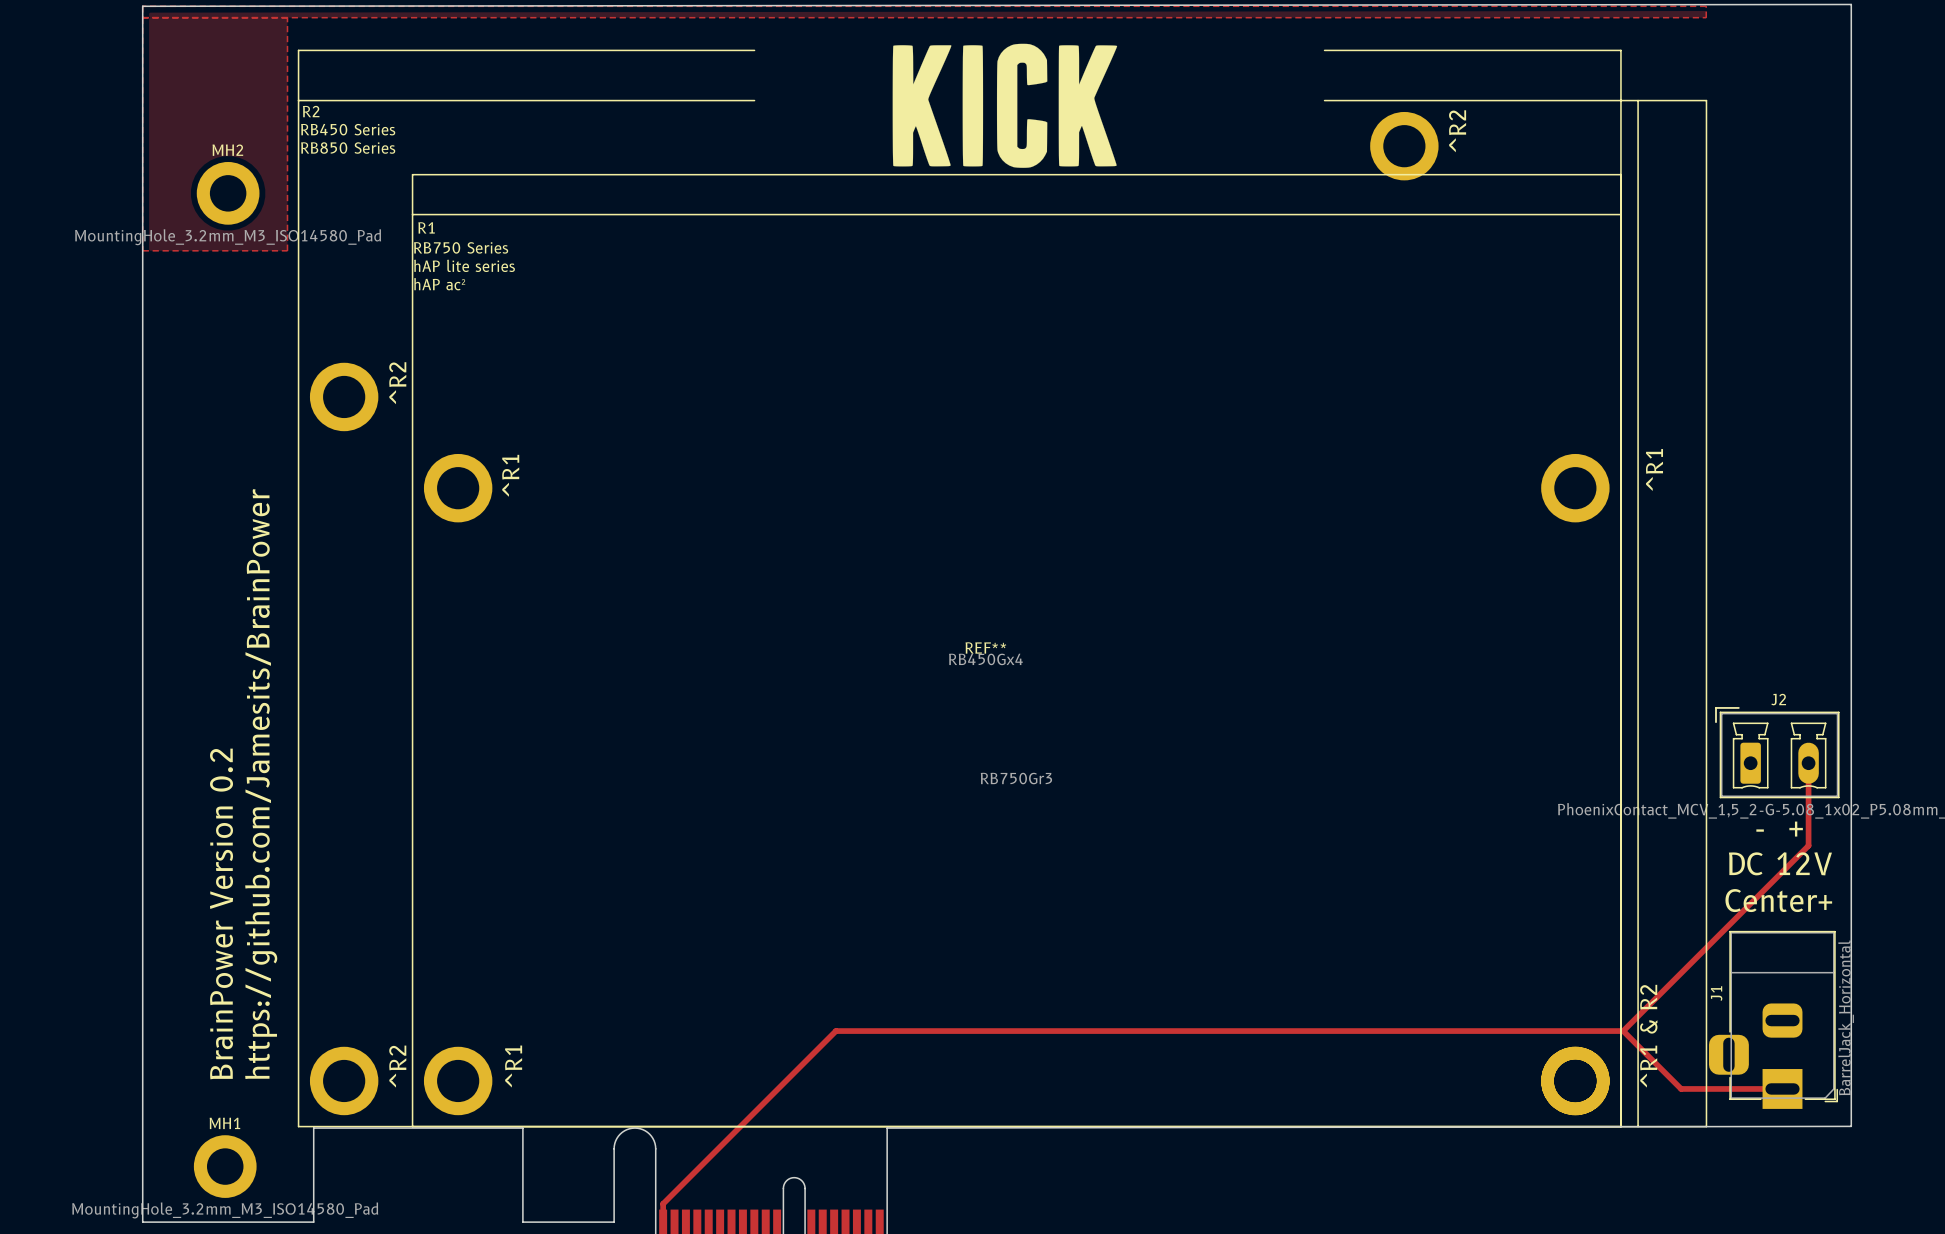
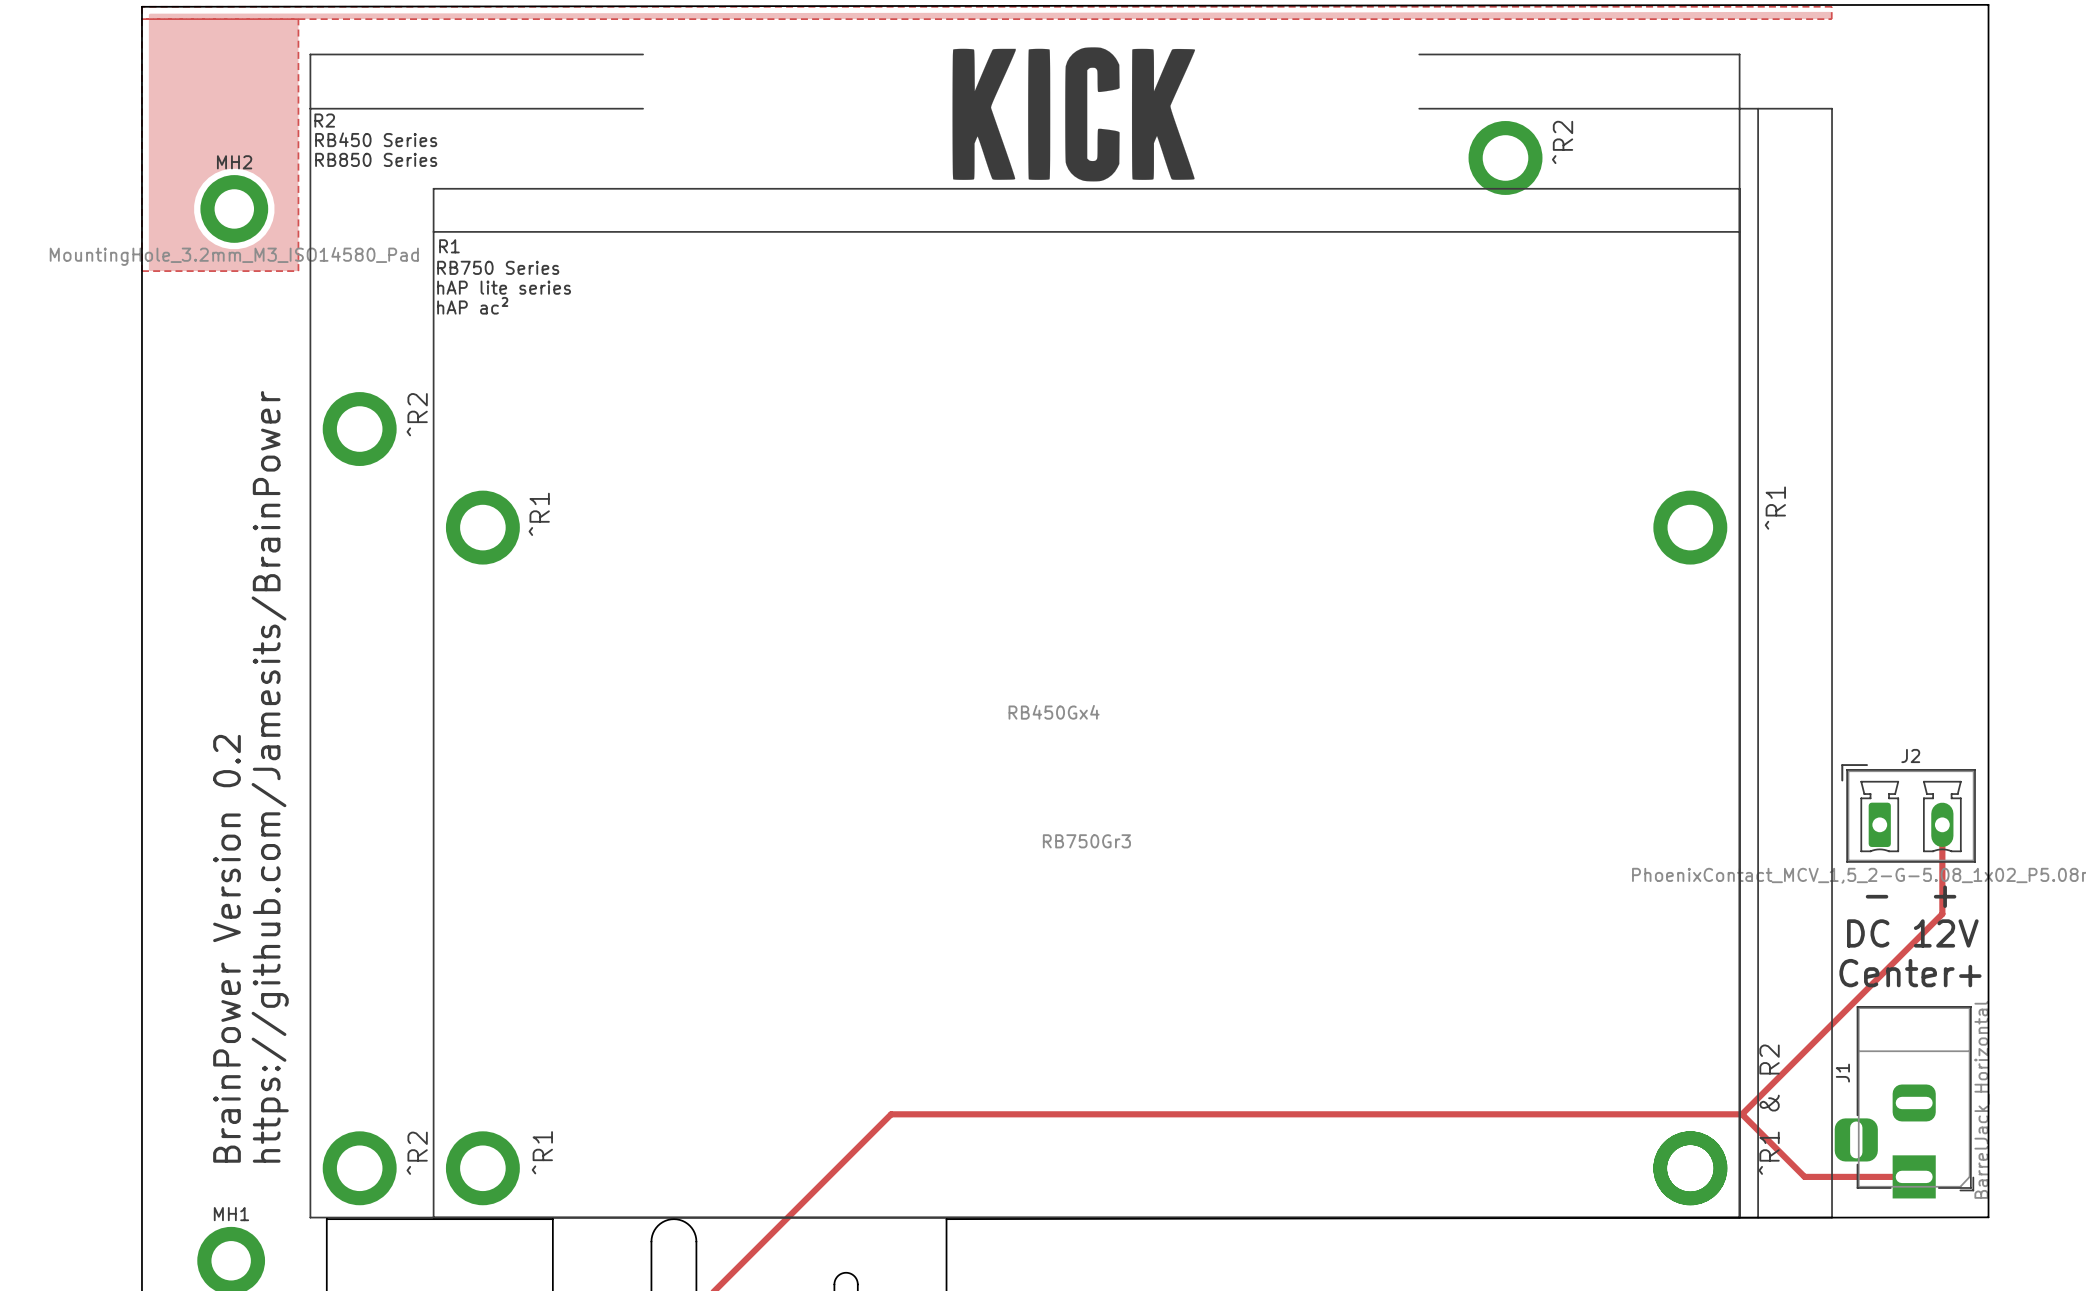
R2 footprint: [297, 49, 1708, 1128] -> [309, 53, 1833, 1219]

